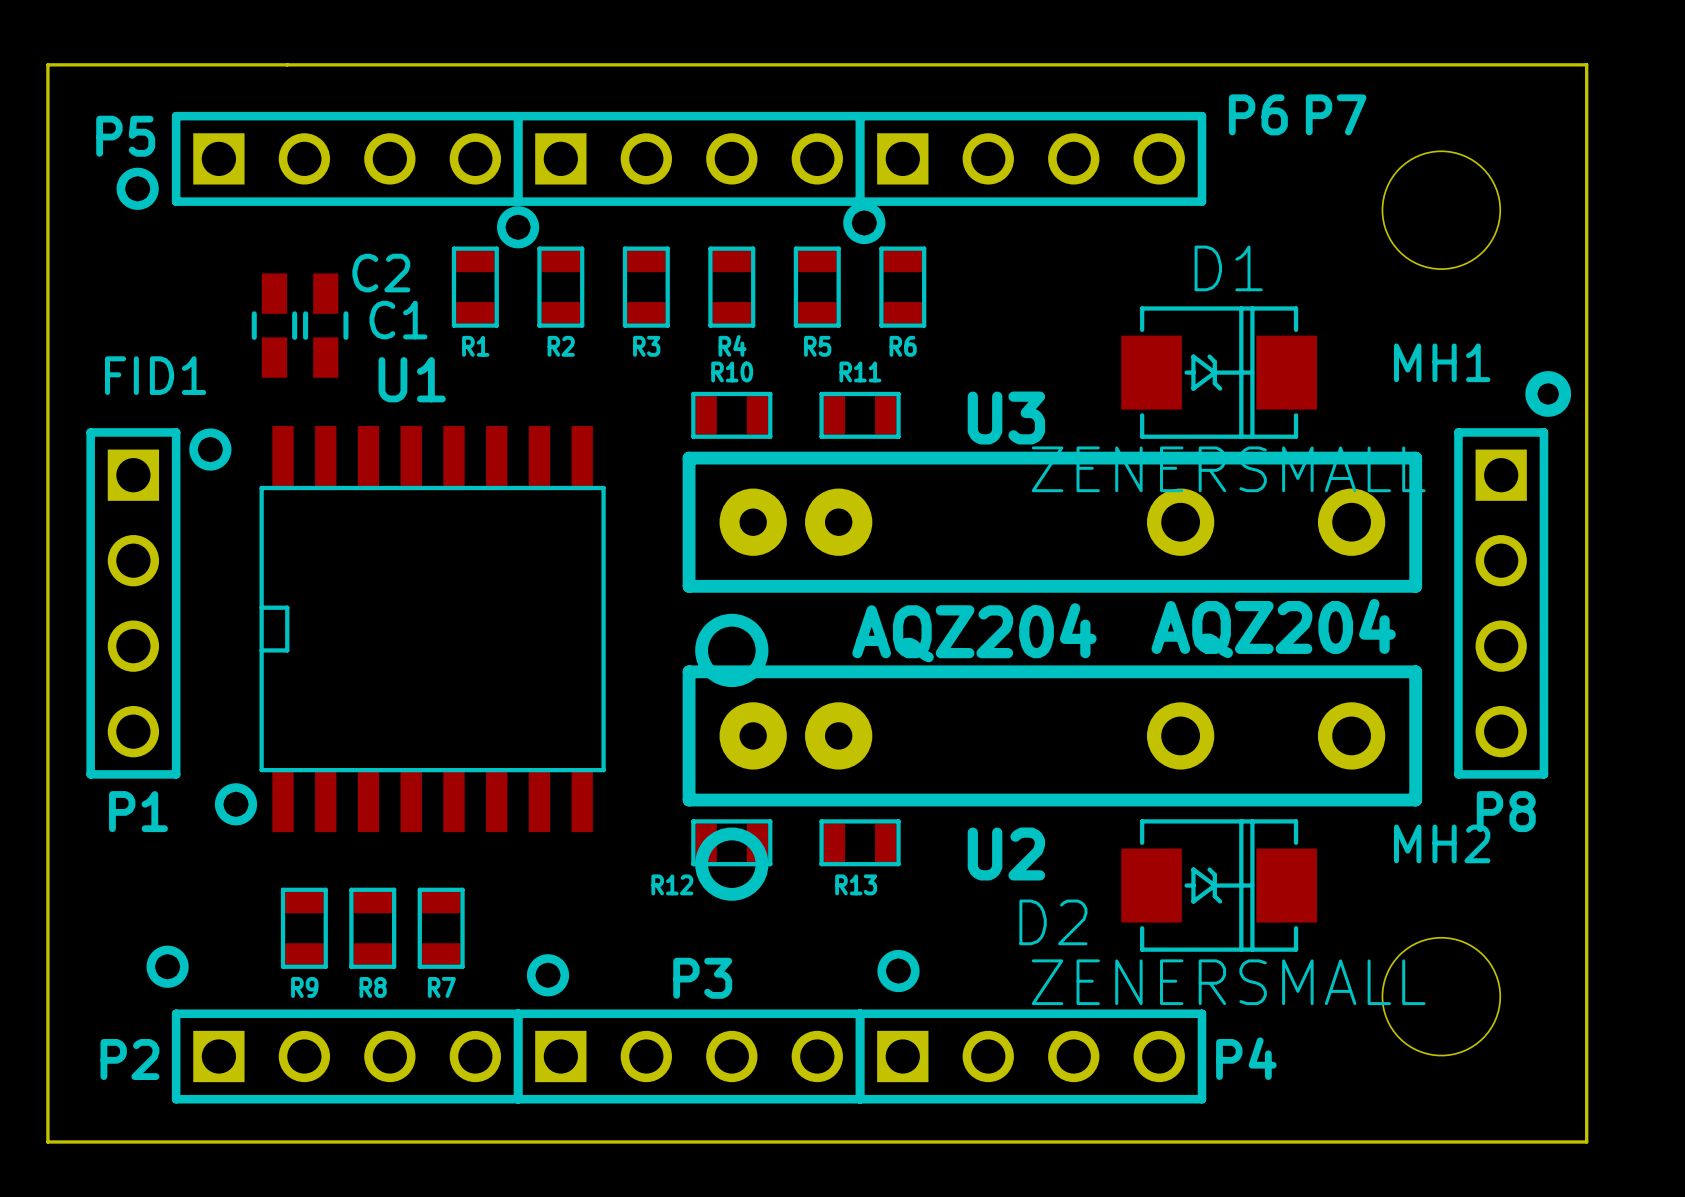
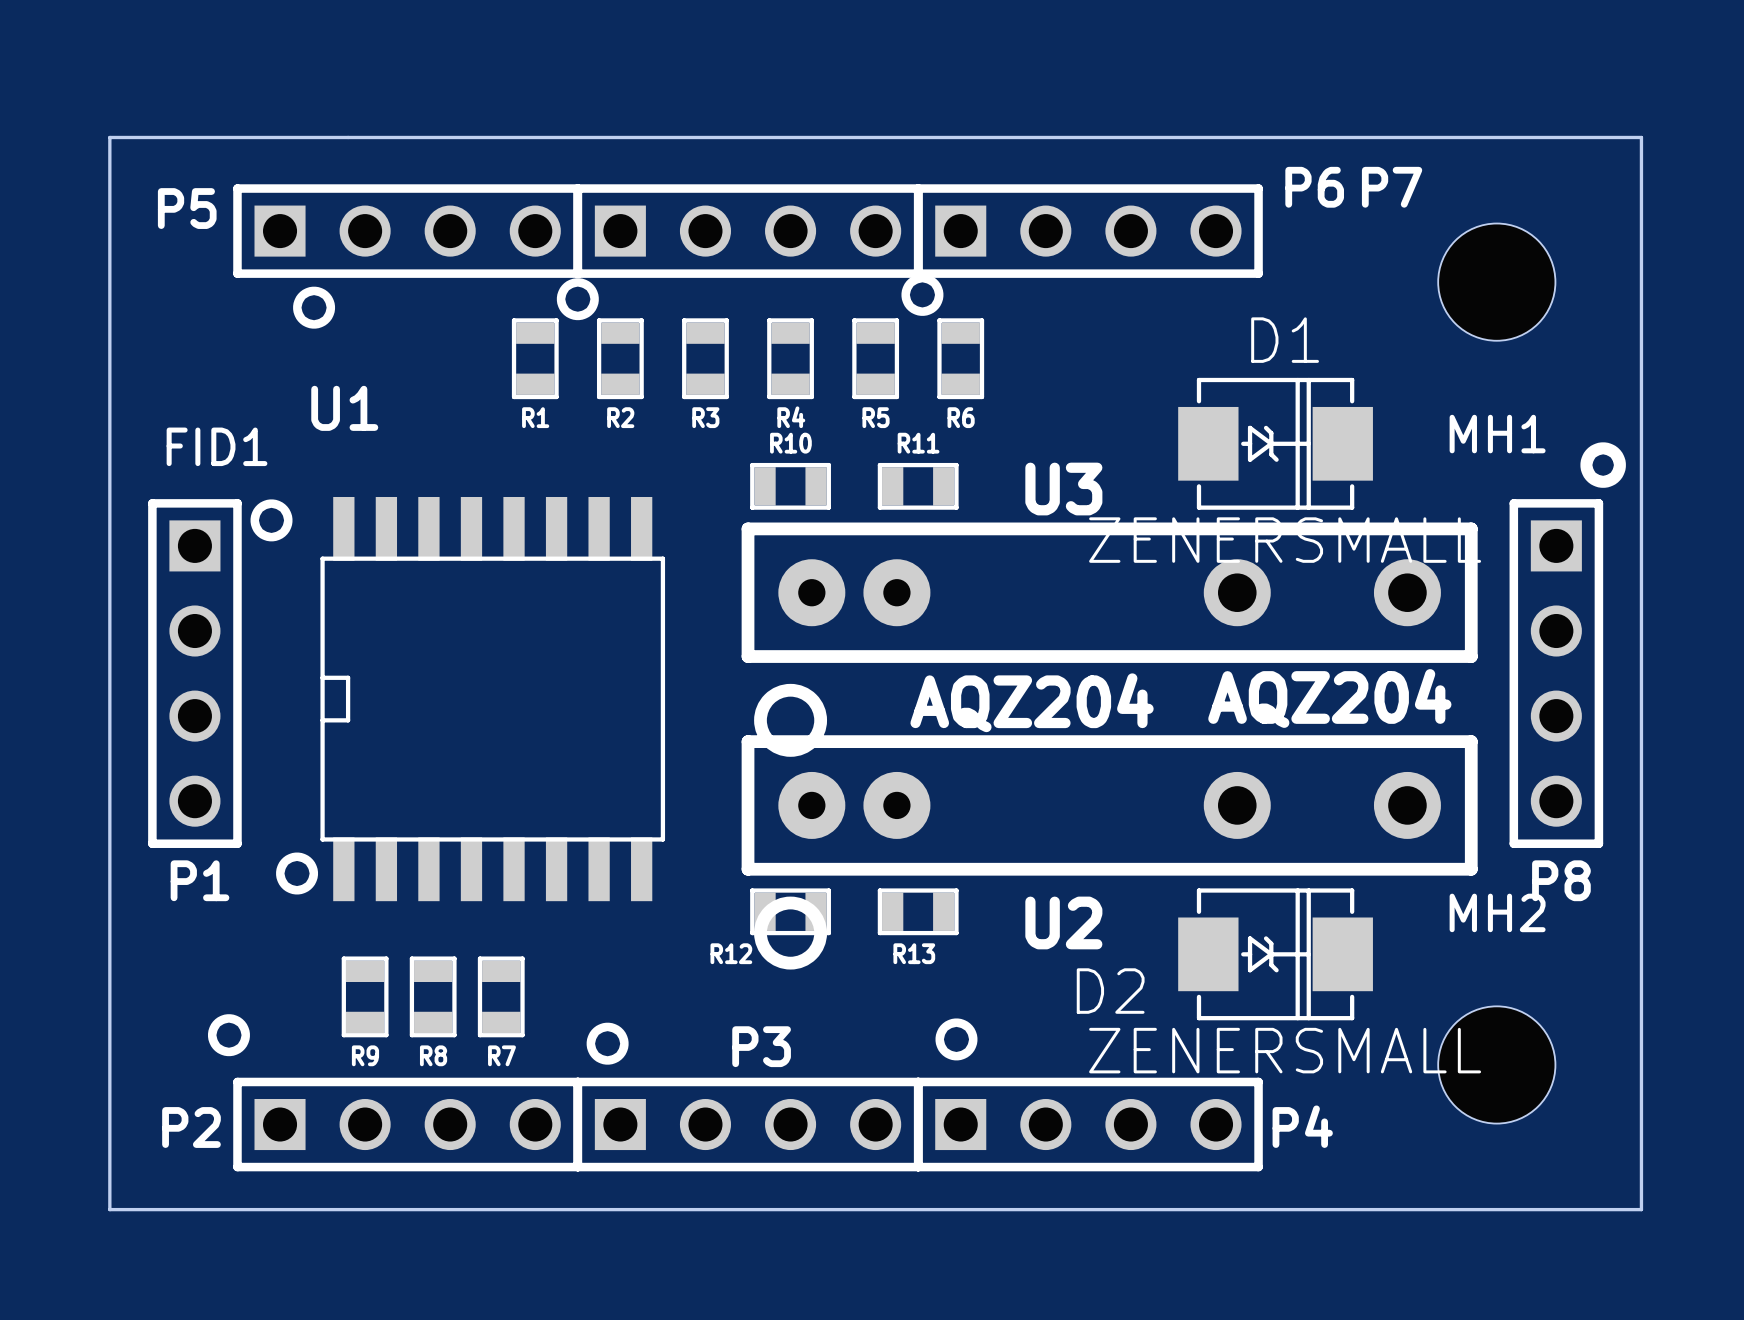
drawing position: (137, 188) -> (314, 307)
C2: (274, 325) -> none
C1: (325, 325) -> none
U1 name position: U1 (412, 379) -> U1 (344, 408)

